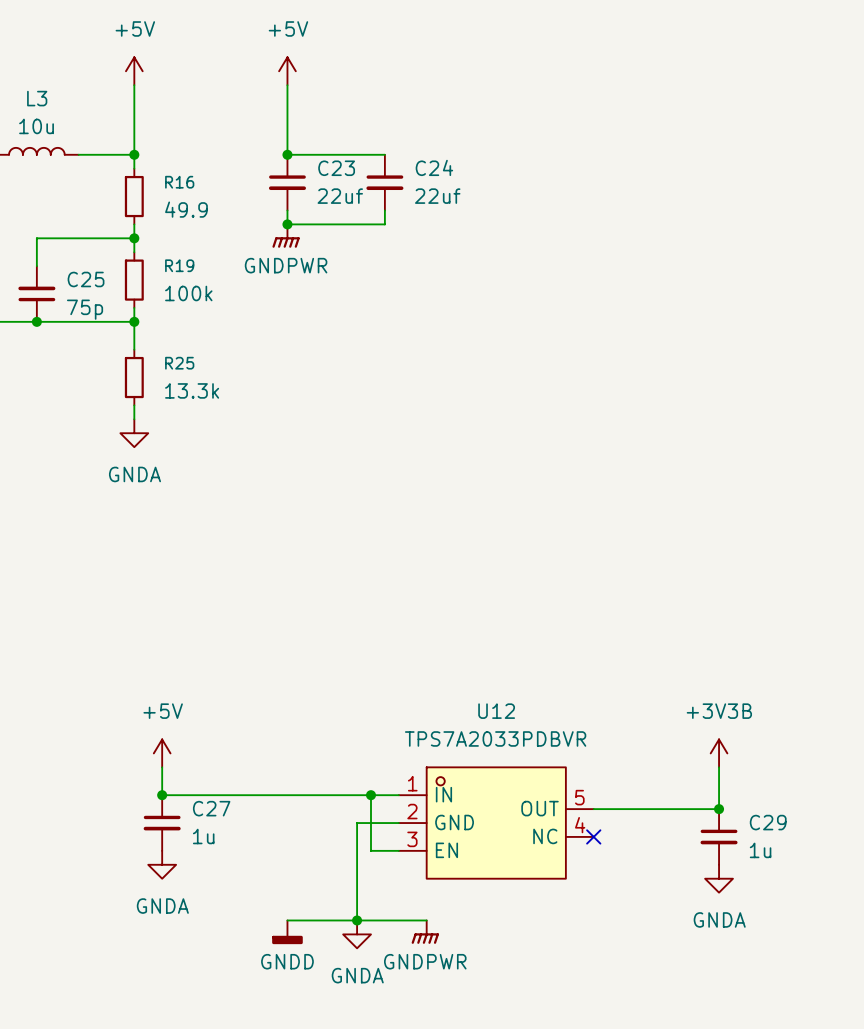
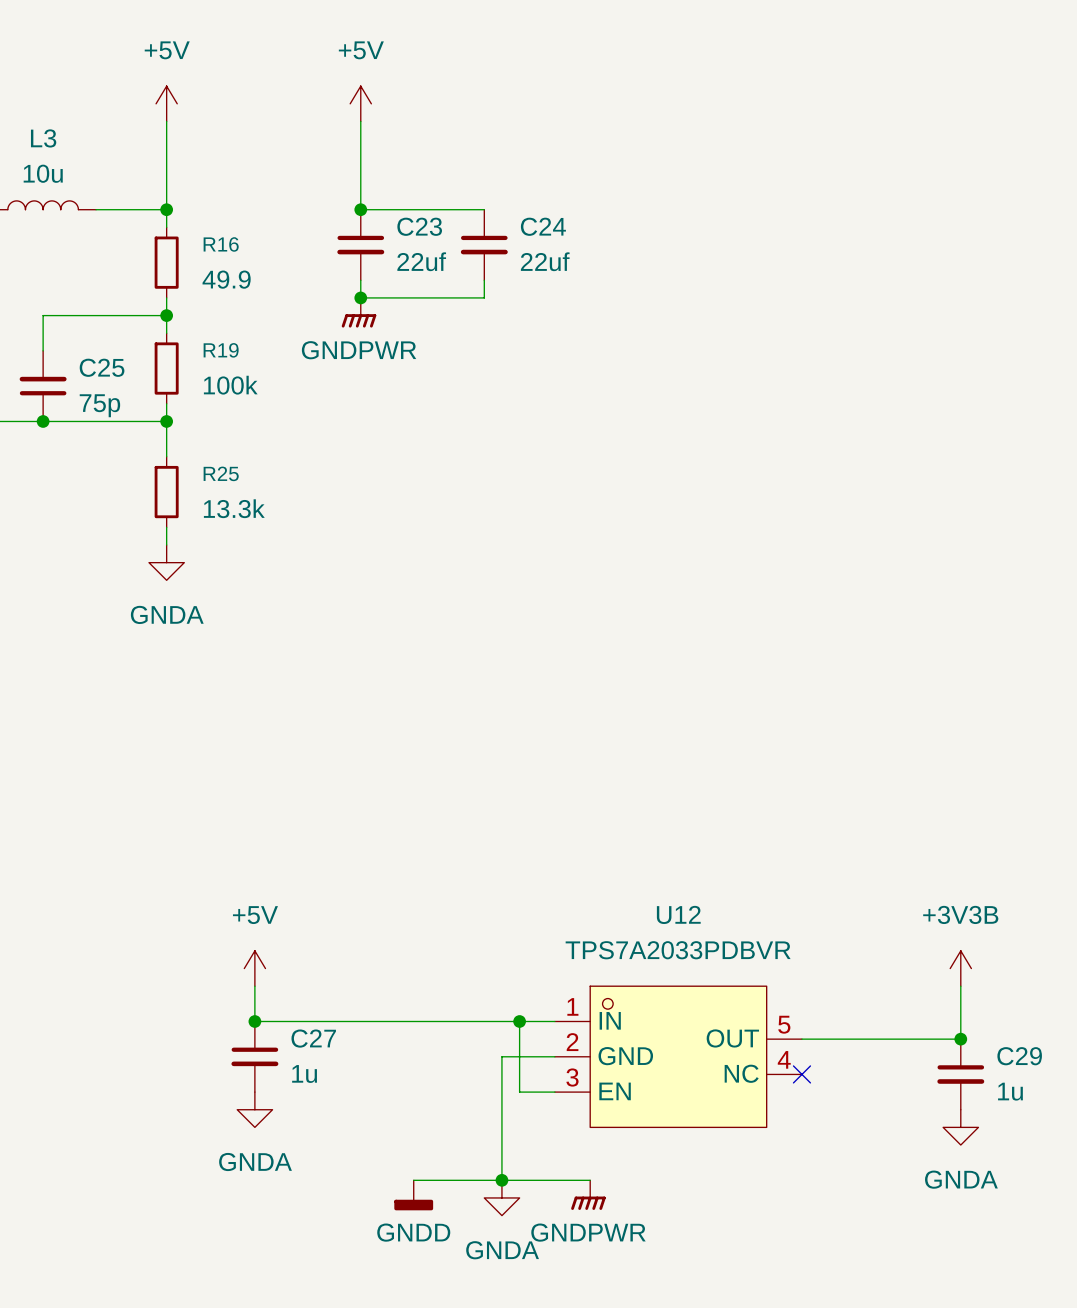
power symbol position: +5V (162, 753) -> +5V (254, 968)
power symbol position: +3V3B (719, 753) -> +3V3B (960, 968)
wire: (162, 767) (162, 795) (203, 795) -> (254, 986) (254, 1021)
wire: (719, 767) (719, 809) -> (960, 986) (960, 1039) (907, 1039)
junction position: (162, 795) -> (254, 1021)
wire: (370, 795) (370, 850) (398, 850) -> (519, 1021) (519, 1092) (554, 1092)
junction position: (370, 795) -> (519, 1021)
junction position: (719, 809) -> (960, 1039)
C27 position: (162, 823) -> (254, 1056)
wire: (398, 823) (357, 823) (357, 920) -> (554, 1056) (501, 1056) (501, 1180)
U12 position: (496, 823) -> (678, 1056)
no-connect mark position: (593, 836) -> (801, 1074)
C29 position: (719, 836) -> (960, 1074)
power symbol position: GNDA (162, 864) -> GNDA (254, 1109)
power symbol position: GNDA (719, 878) -> GNDA (960, 1127)
wire: (287, 920) (329, 920) -> (537, 1180) (590, 1180)
junction position: (357, 920) -> (501, 1180)
power symbol position: GNDD (287, 932) -> GNDD (413, 1195)
power symbol position: GNDPWR (425, 932) -> GNDPWR (588, 1195)
power symbol position: GNDA (357, 934) -> GNDA (501, 1197)

